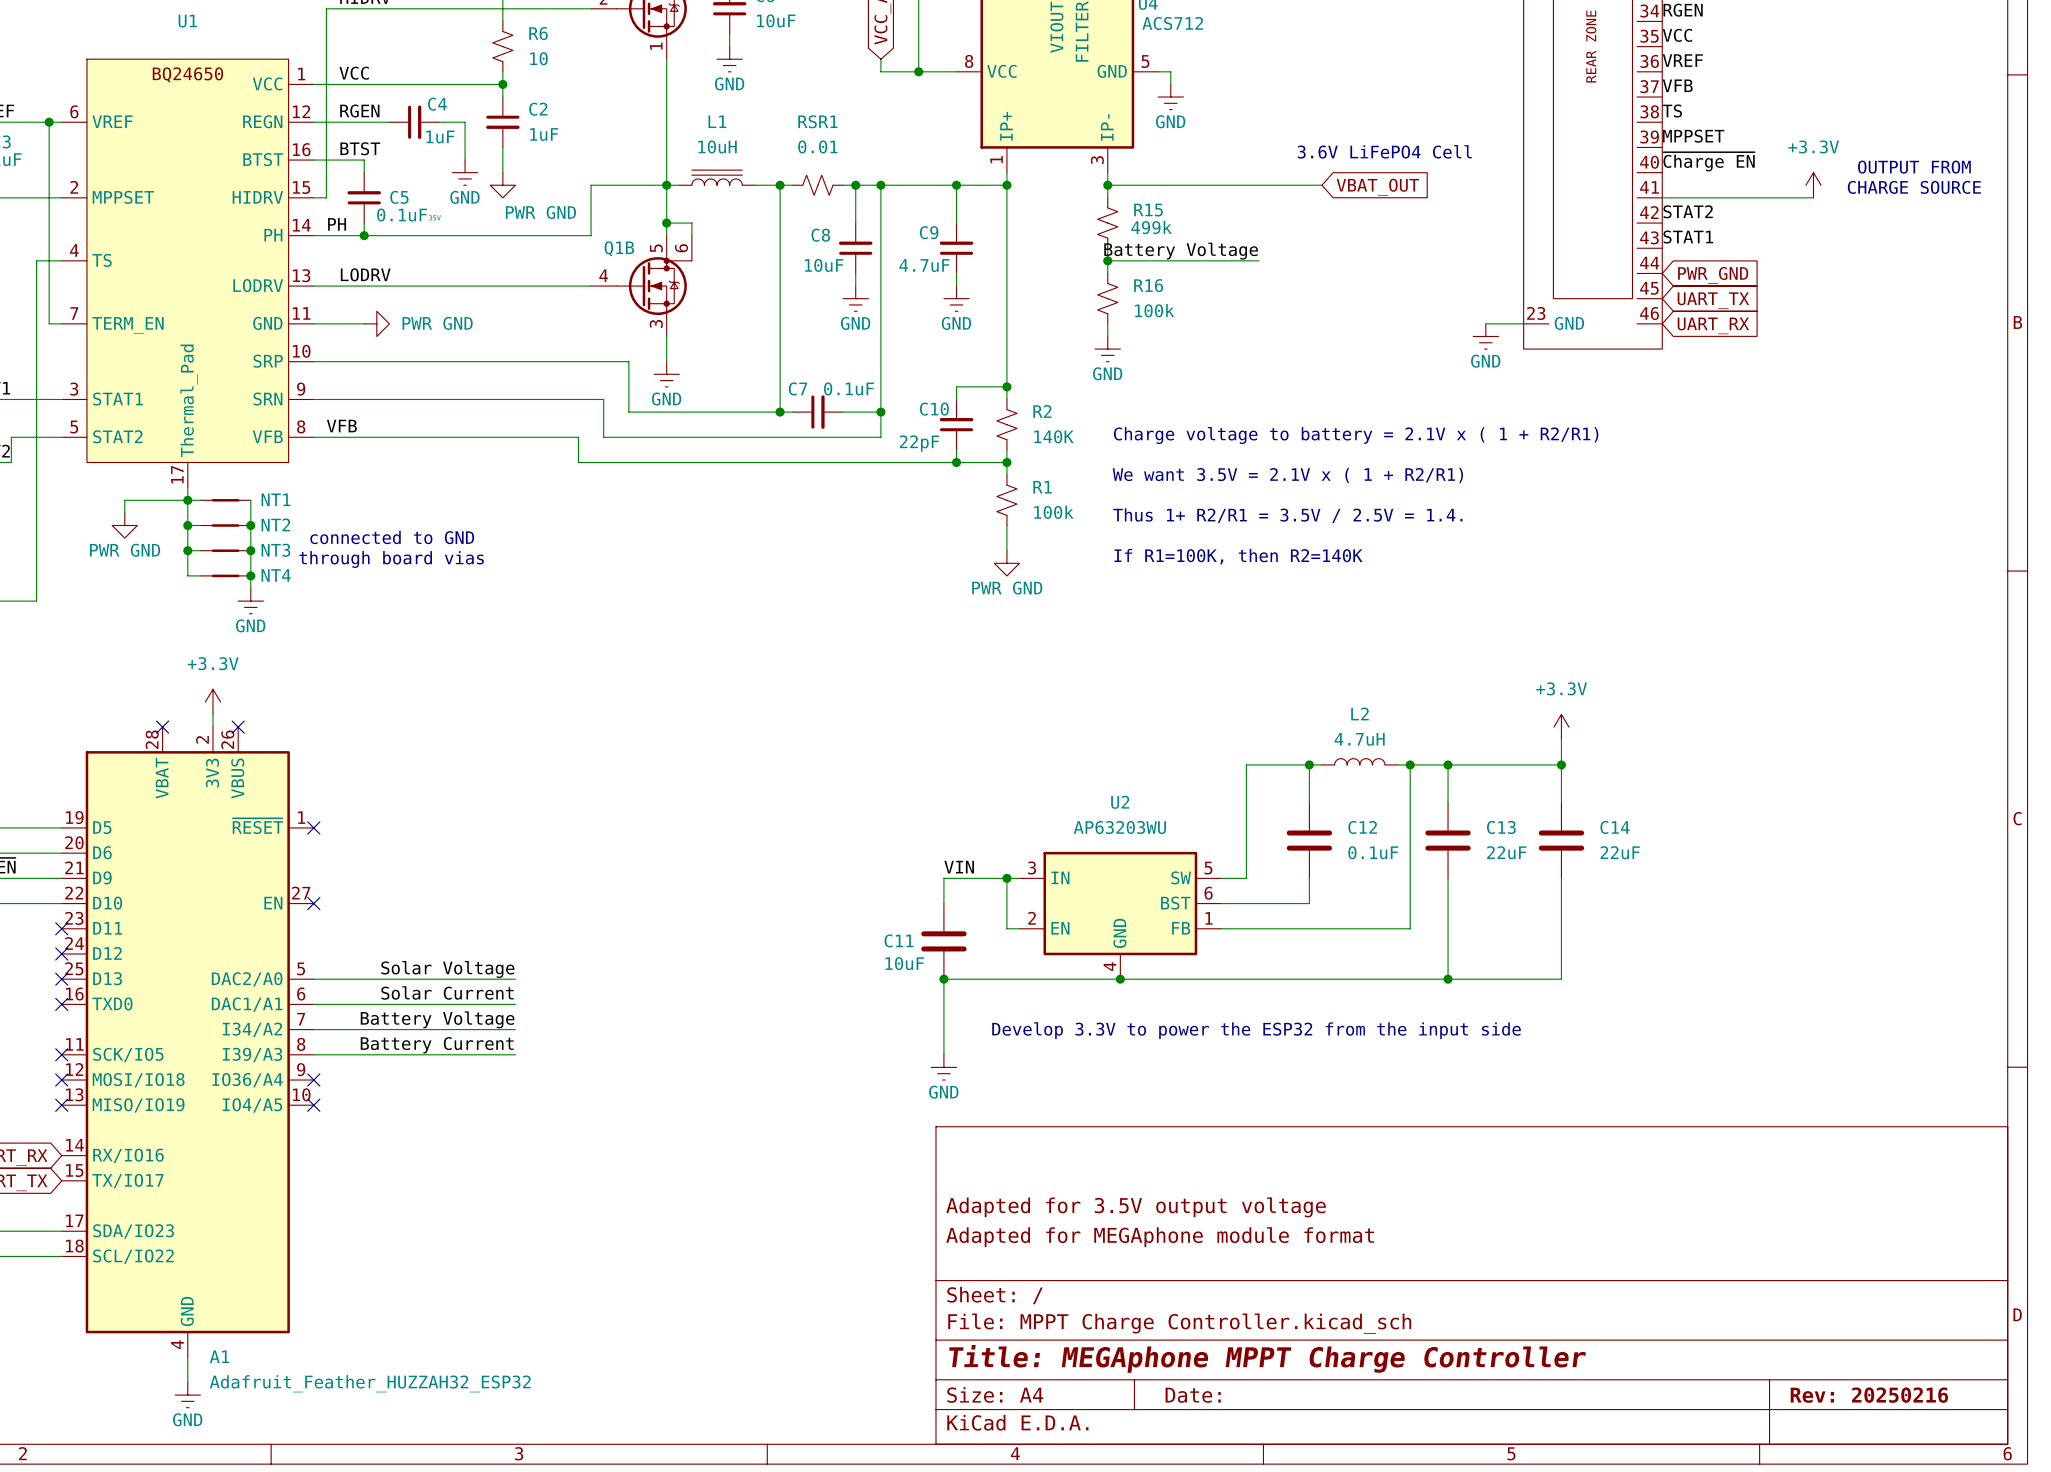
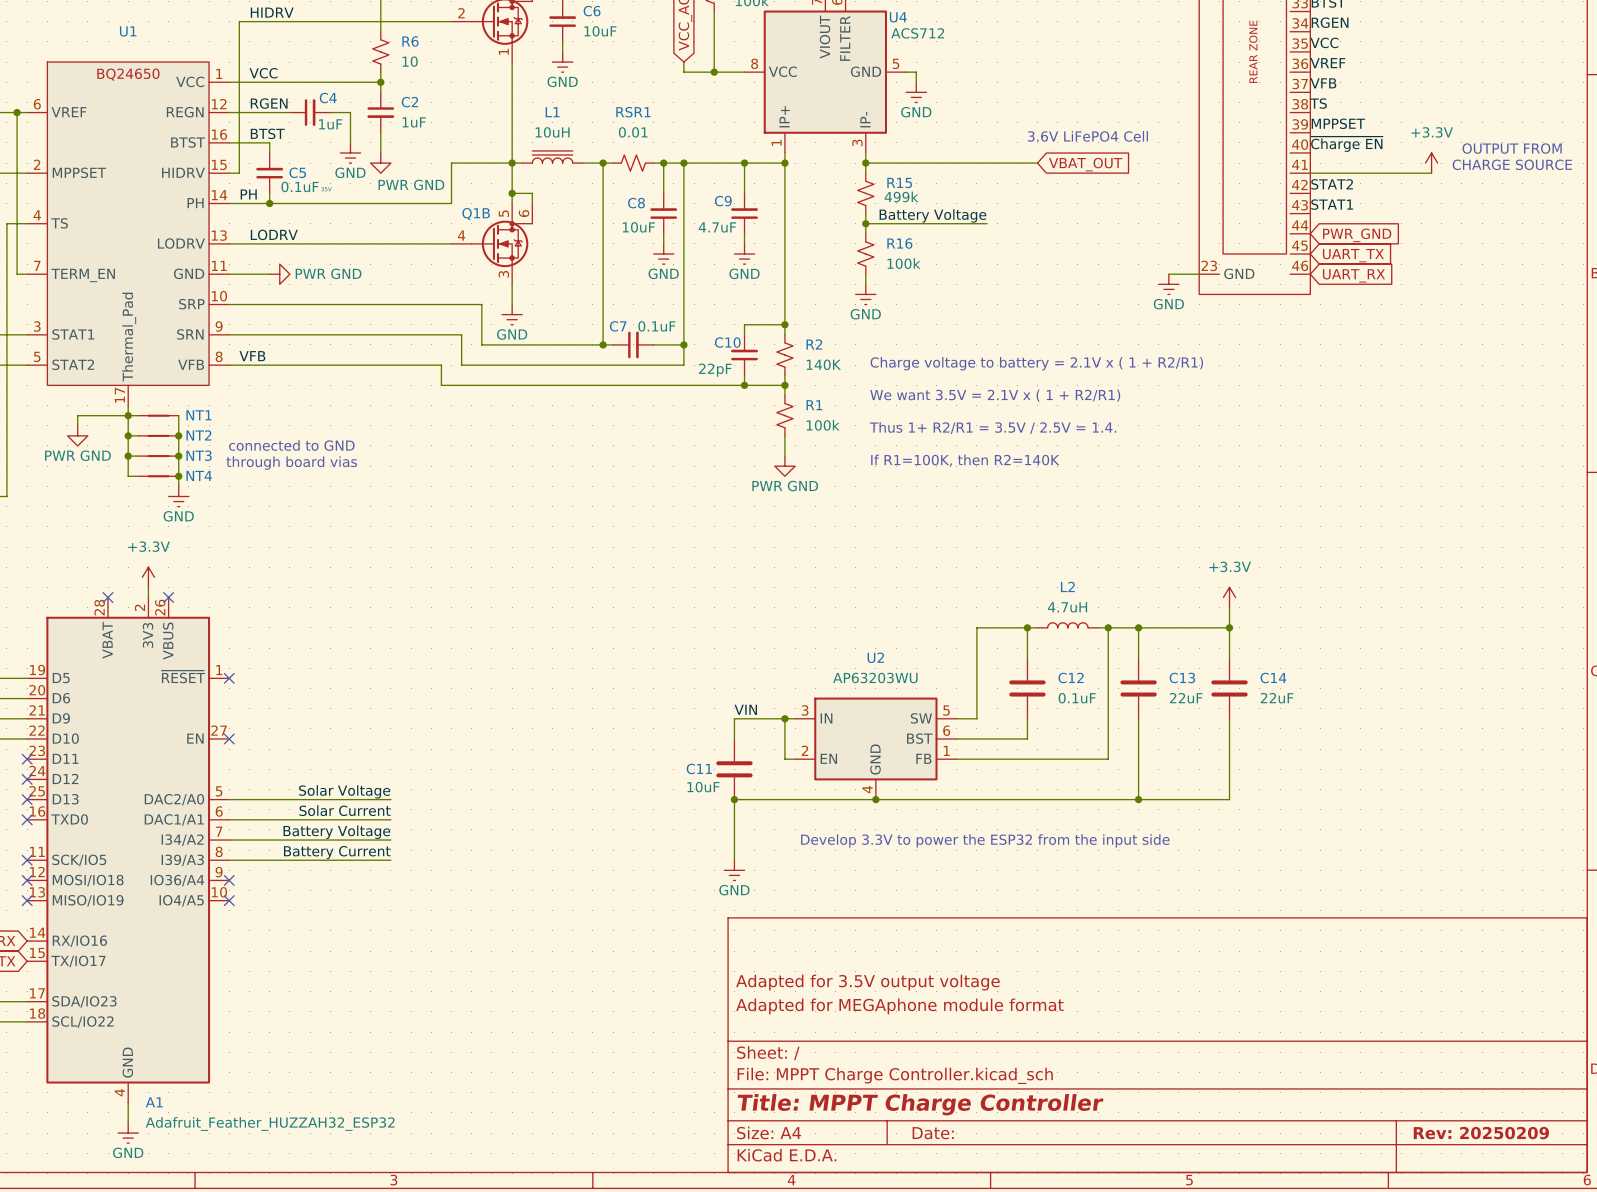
title block: Title: MEGAphone MPPT Charge Controller (1267, 1358) -> Title: MPPT Charge Controller (920, 1104)
title block: Rev: 20250216 (1869, 1395) -> Rev: 20250209 (1481, 1133)

